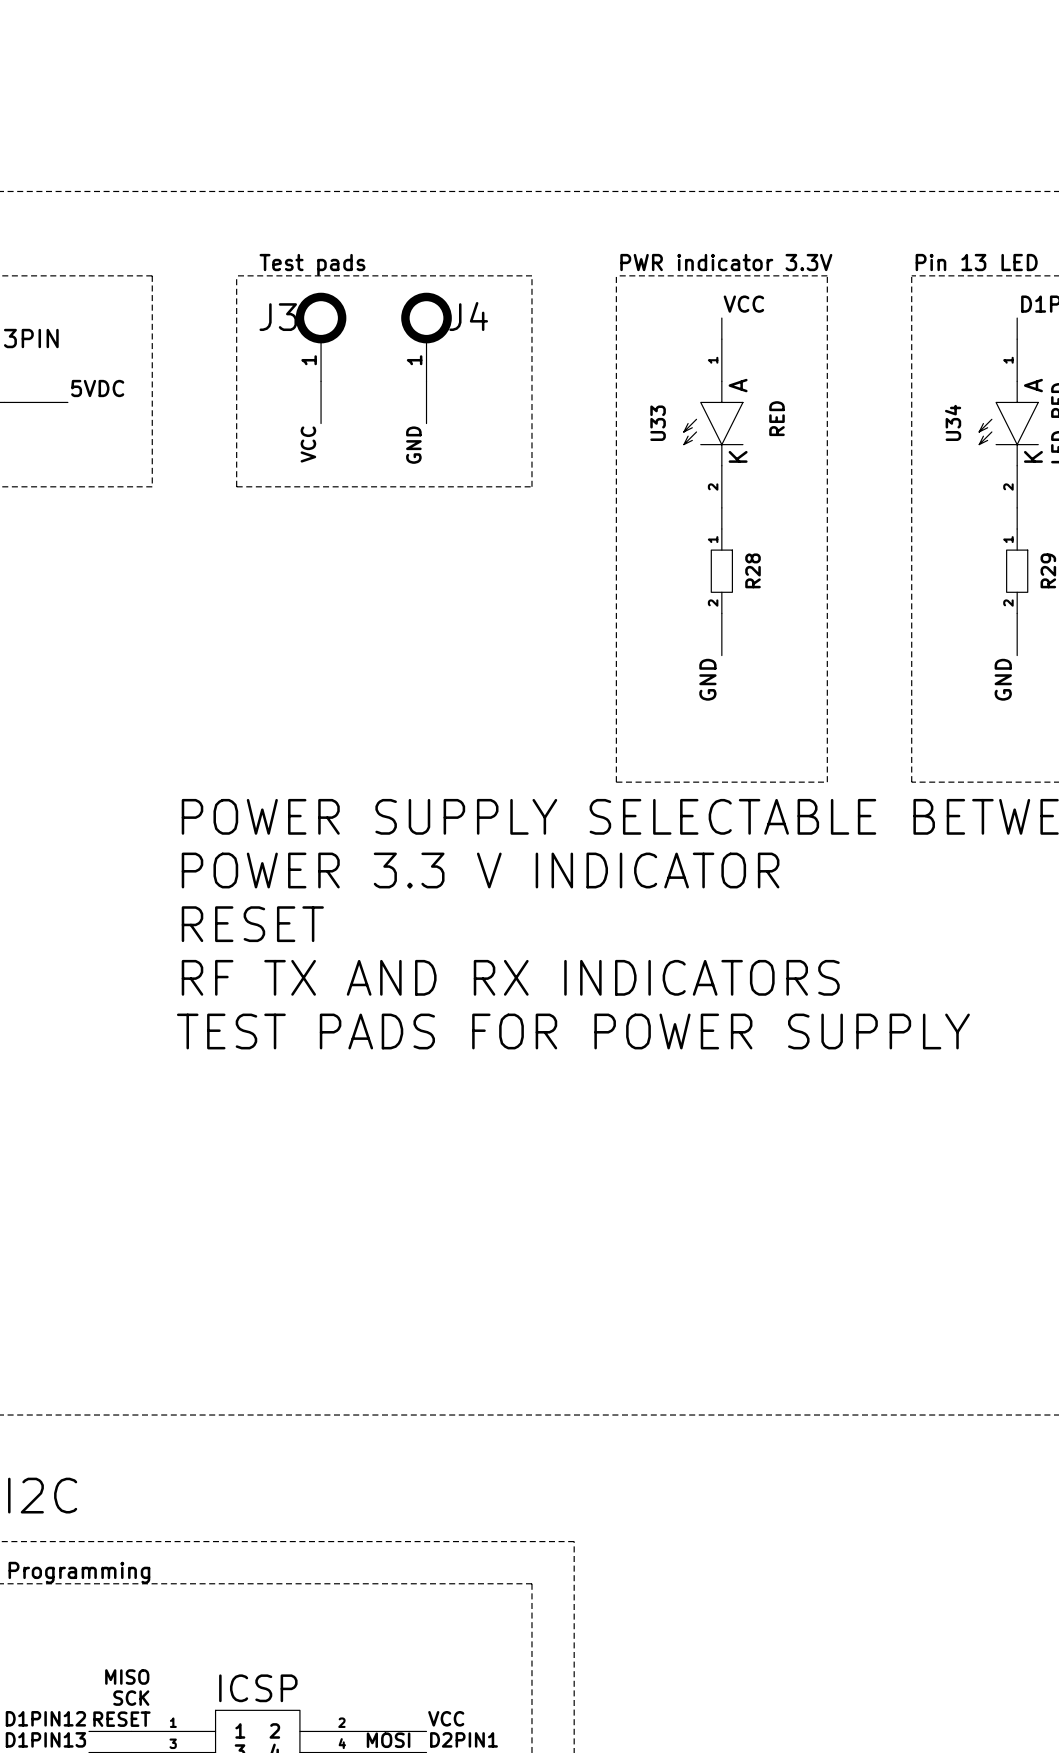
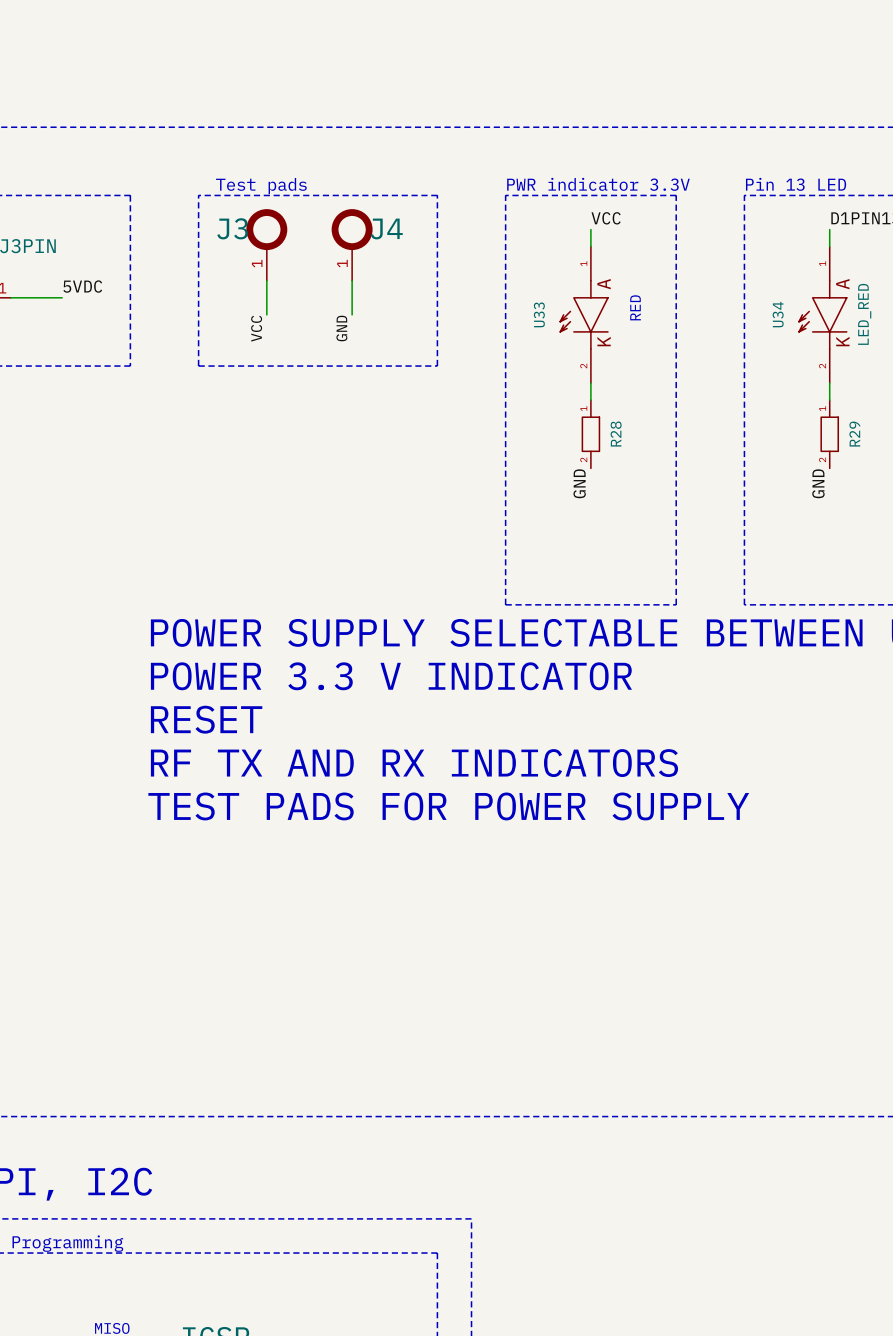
wire: (721, 613) (721, 655) -> none
wire: (1017, 613) (1017, 655) -> none
label position: GND (707, 679) -> GND (579, 483)
label position: GND (1003, 679) -> GND (818, 483)

